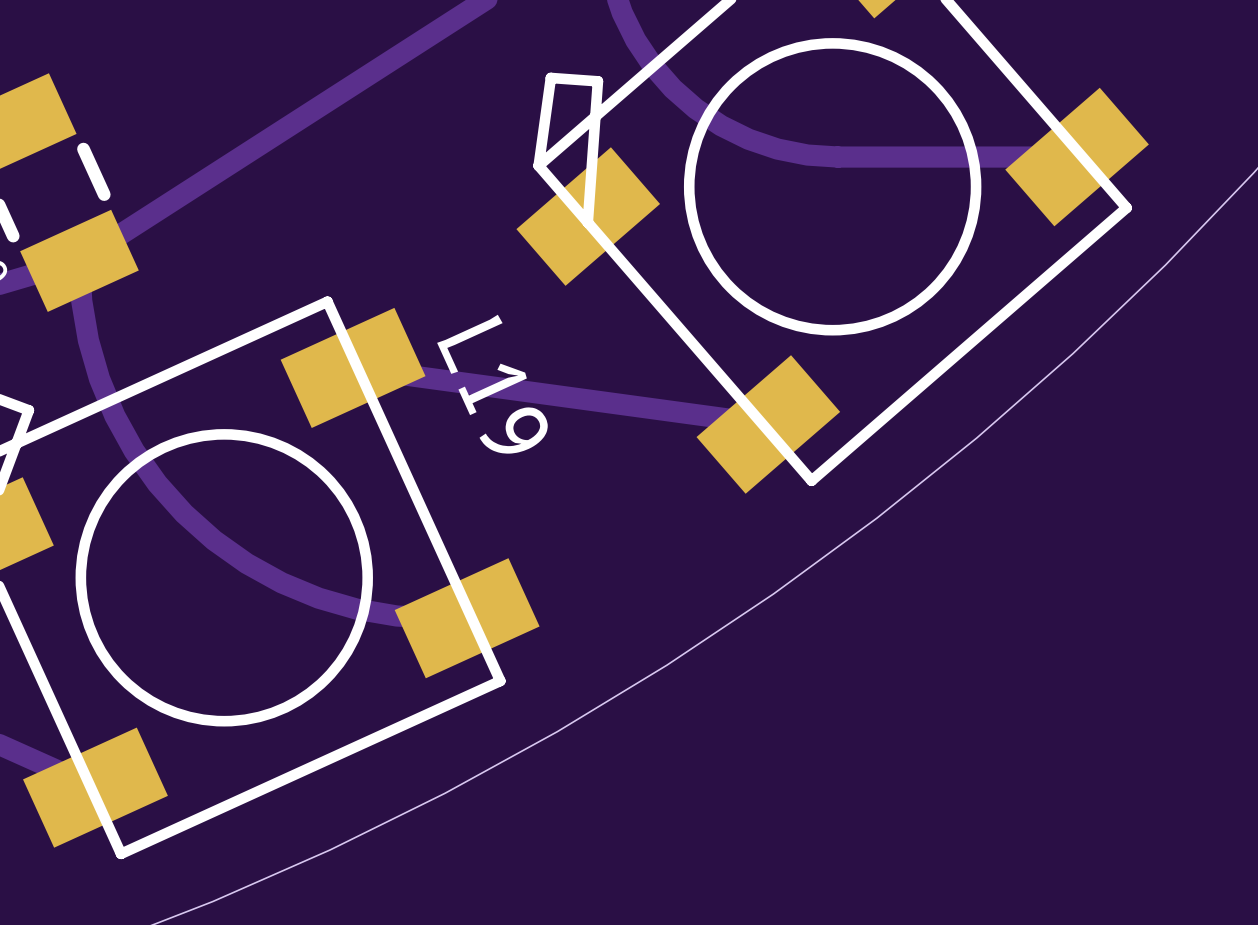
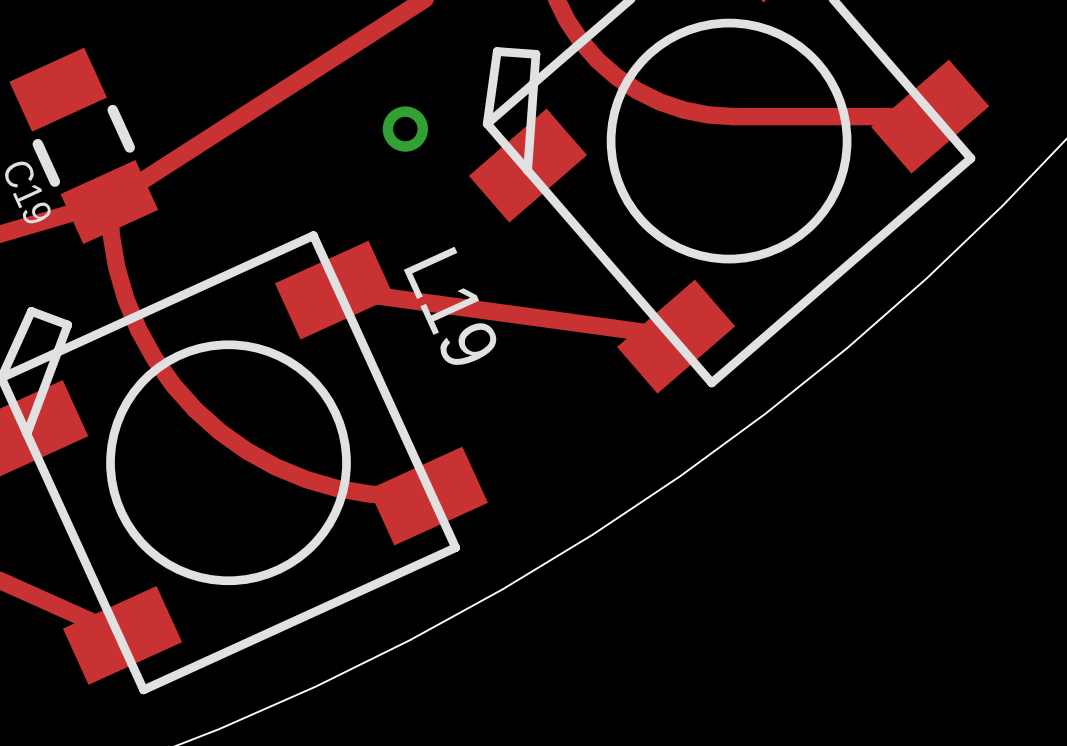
via: none -> (405, 129)

